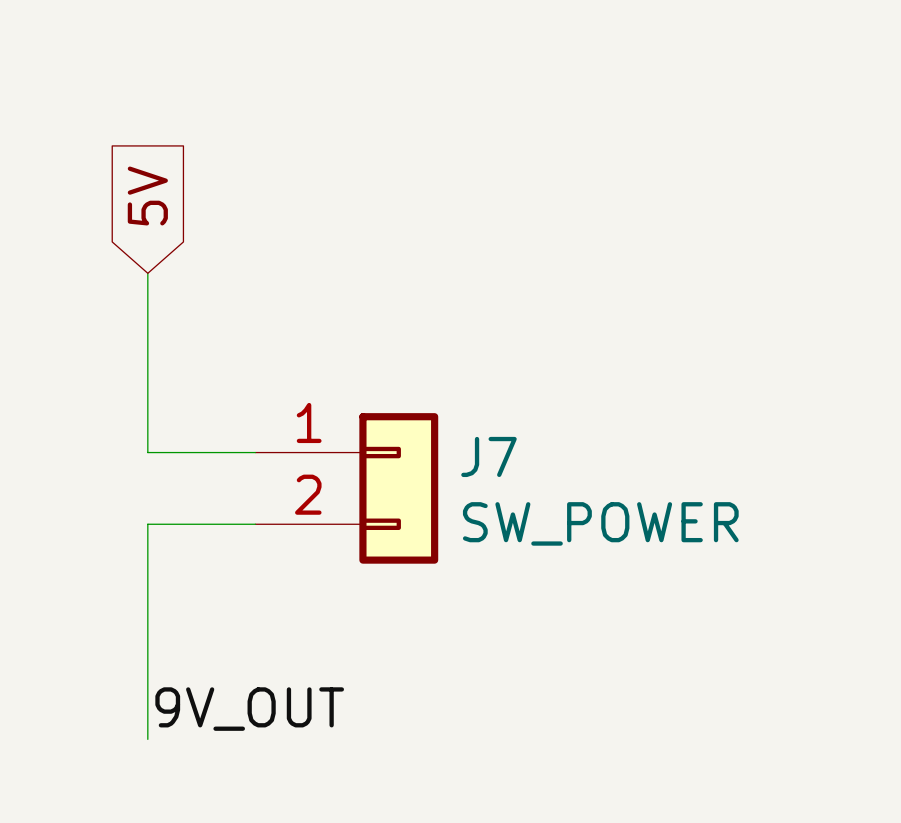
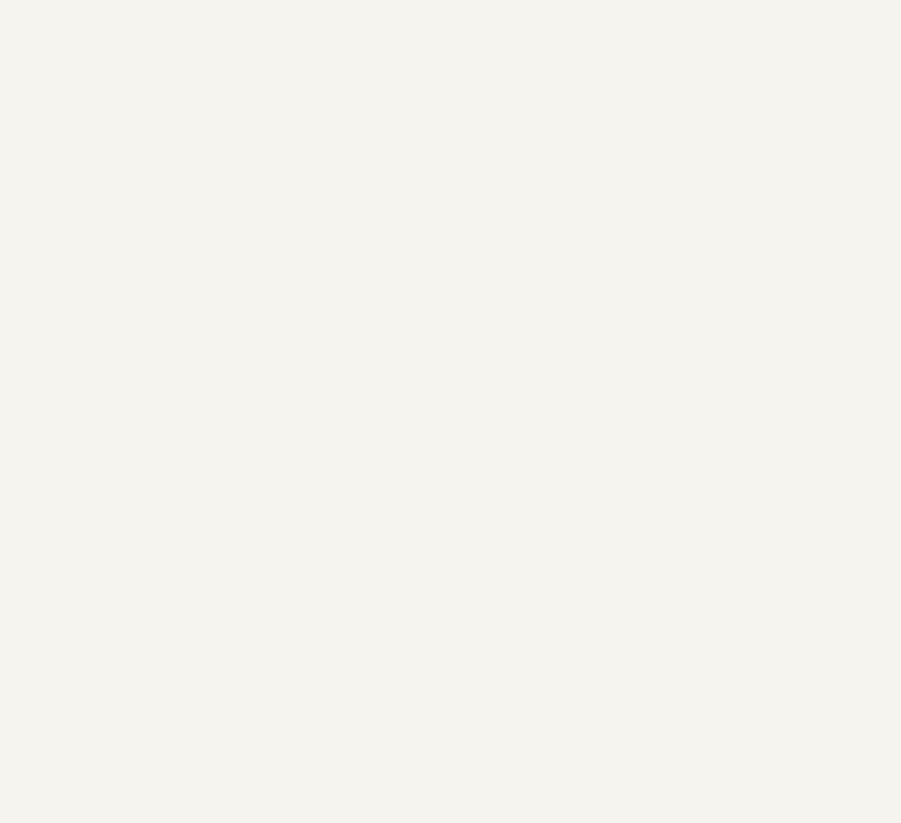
global label: 5V (147, 196) -> none
wire: (147, 273) (147, 452) (255, 452) -> none
J7: SW_POWER (346, 488) -> none
wire: (255, 524) (147, 524) (147, 739) -> none
label: 9V_OUT (249, 709) -> none

